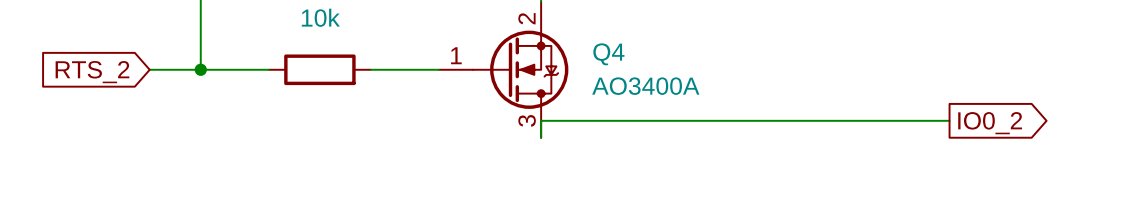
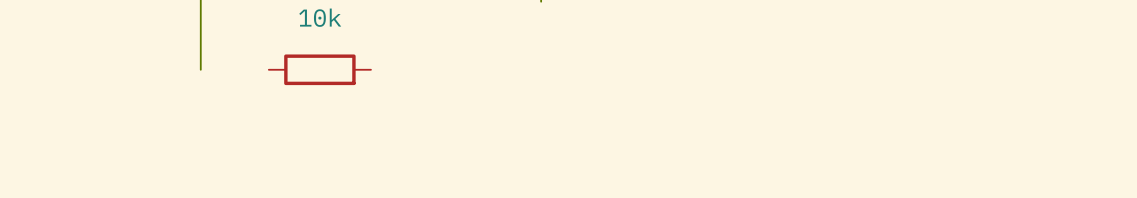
wire: (149, 69) (268, 69) -> none
junction: (200, 69) -> none
wire: (370, 69) (439, 69) -> none
Q4: AO3400A (503, 69) -> none
global label: RTS_2 (92, 72) -> none
wire: (949, 120) (541, 120) (541, 137) -> none
global label: IO0_2 (990, 123) -> none

